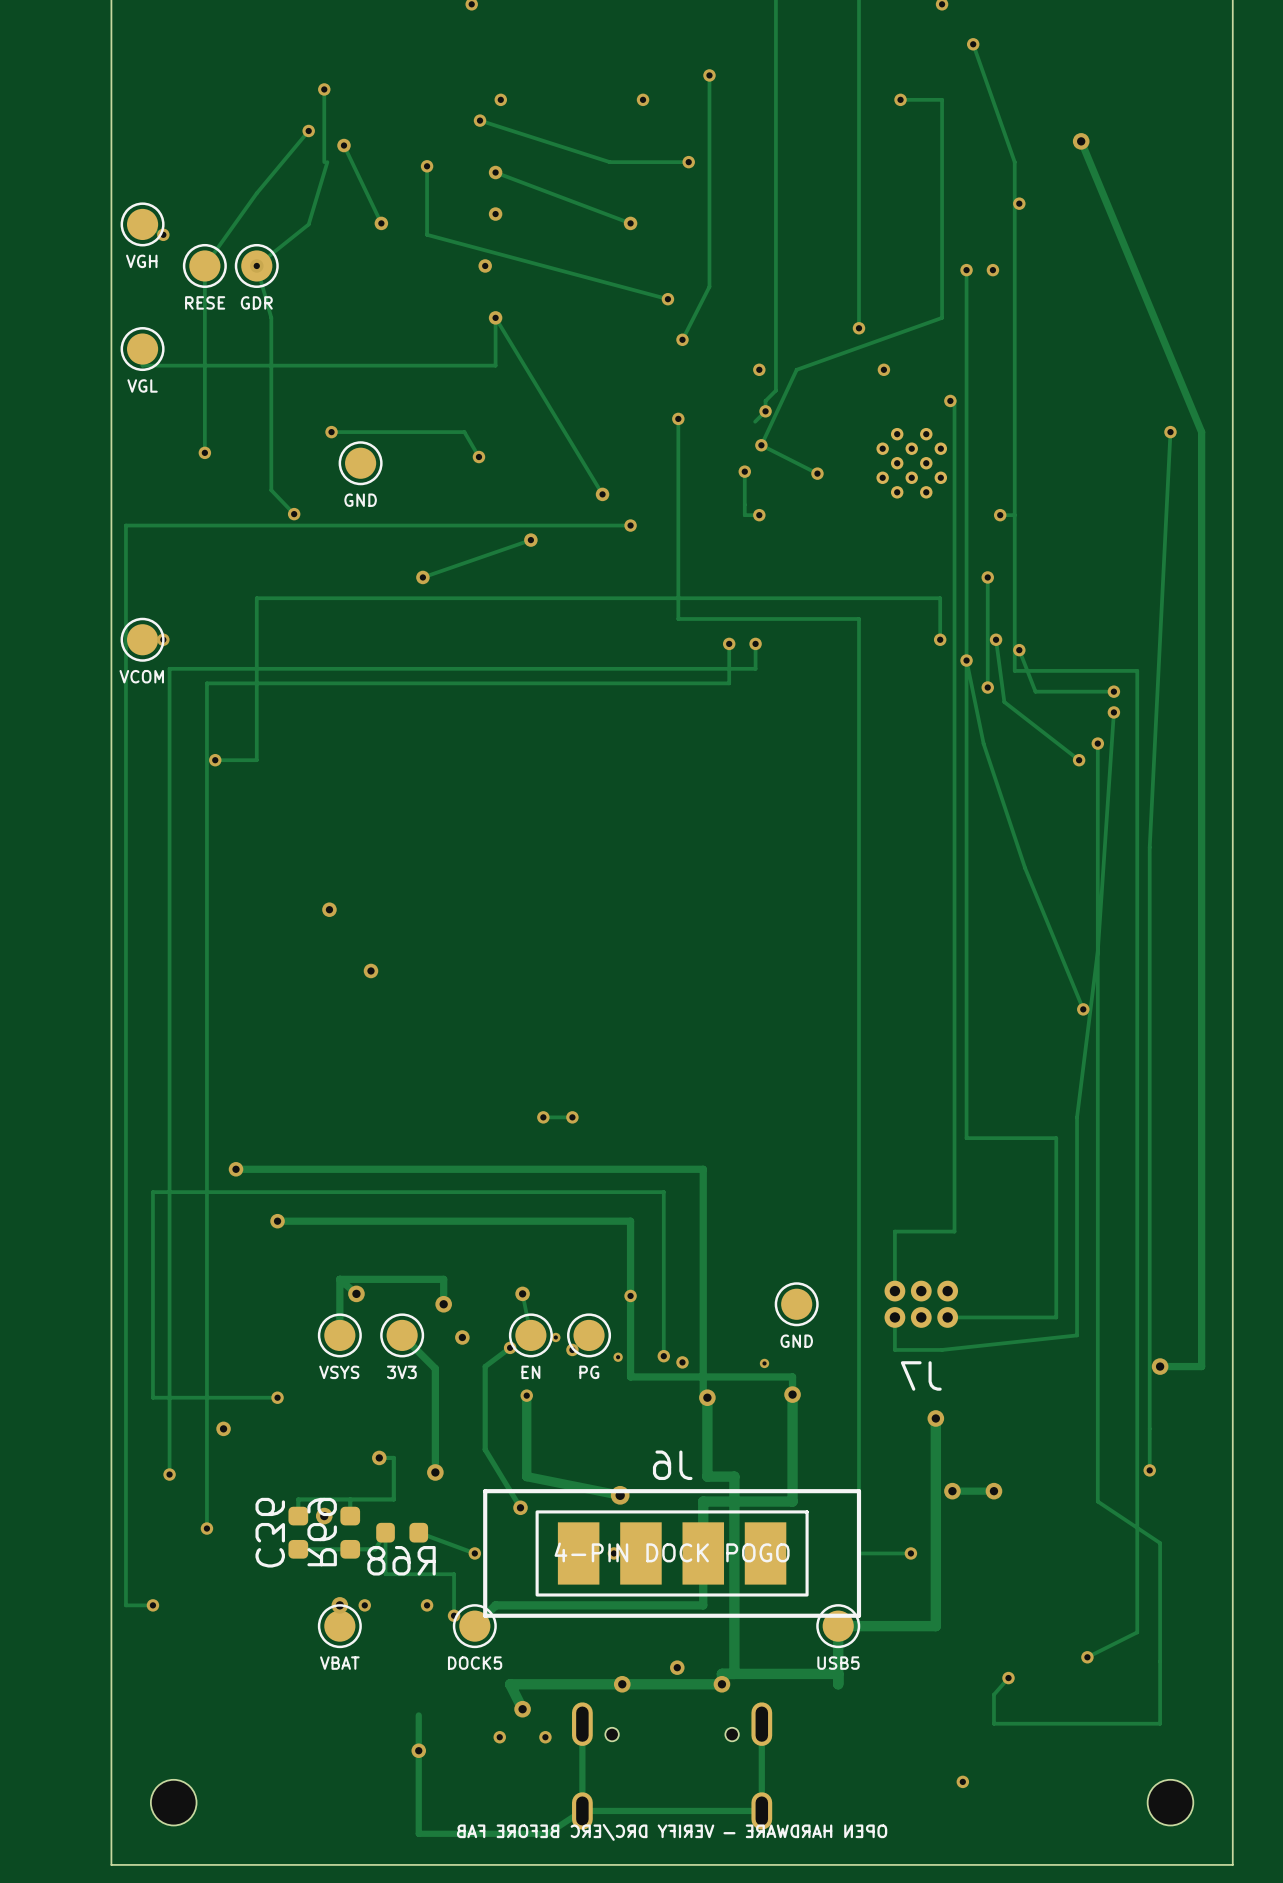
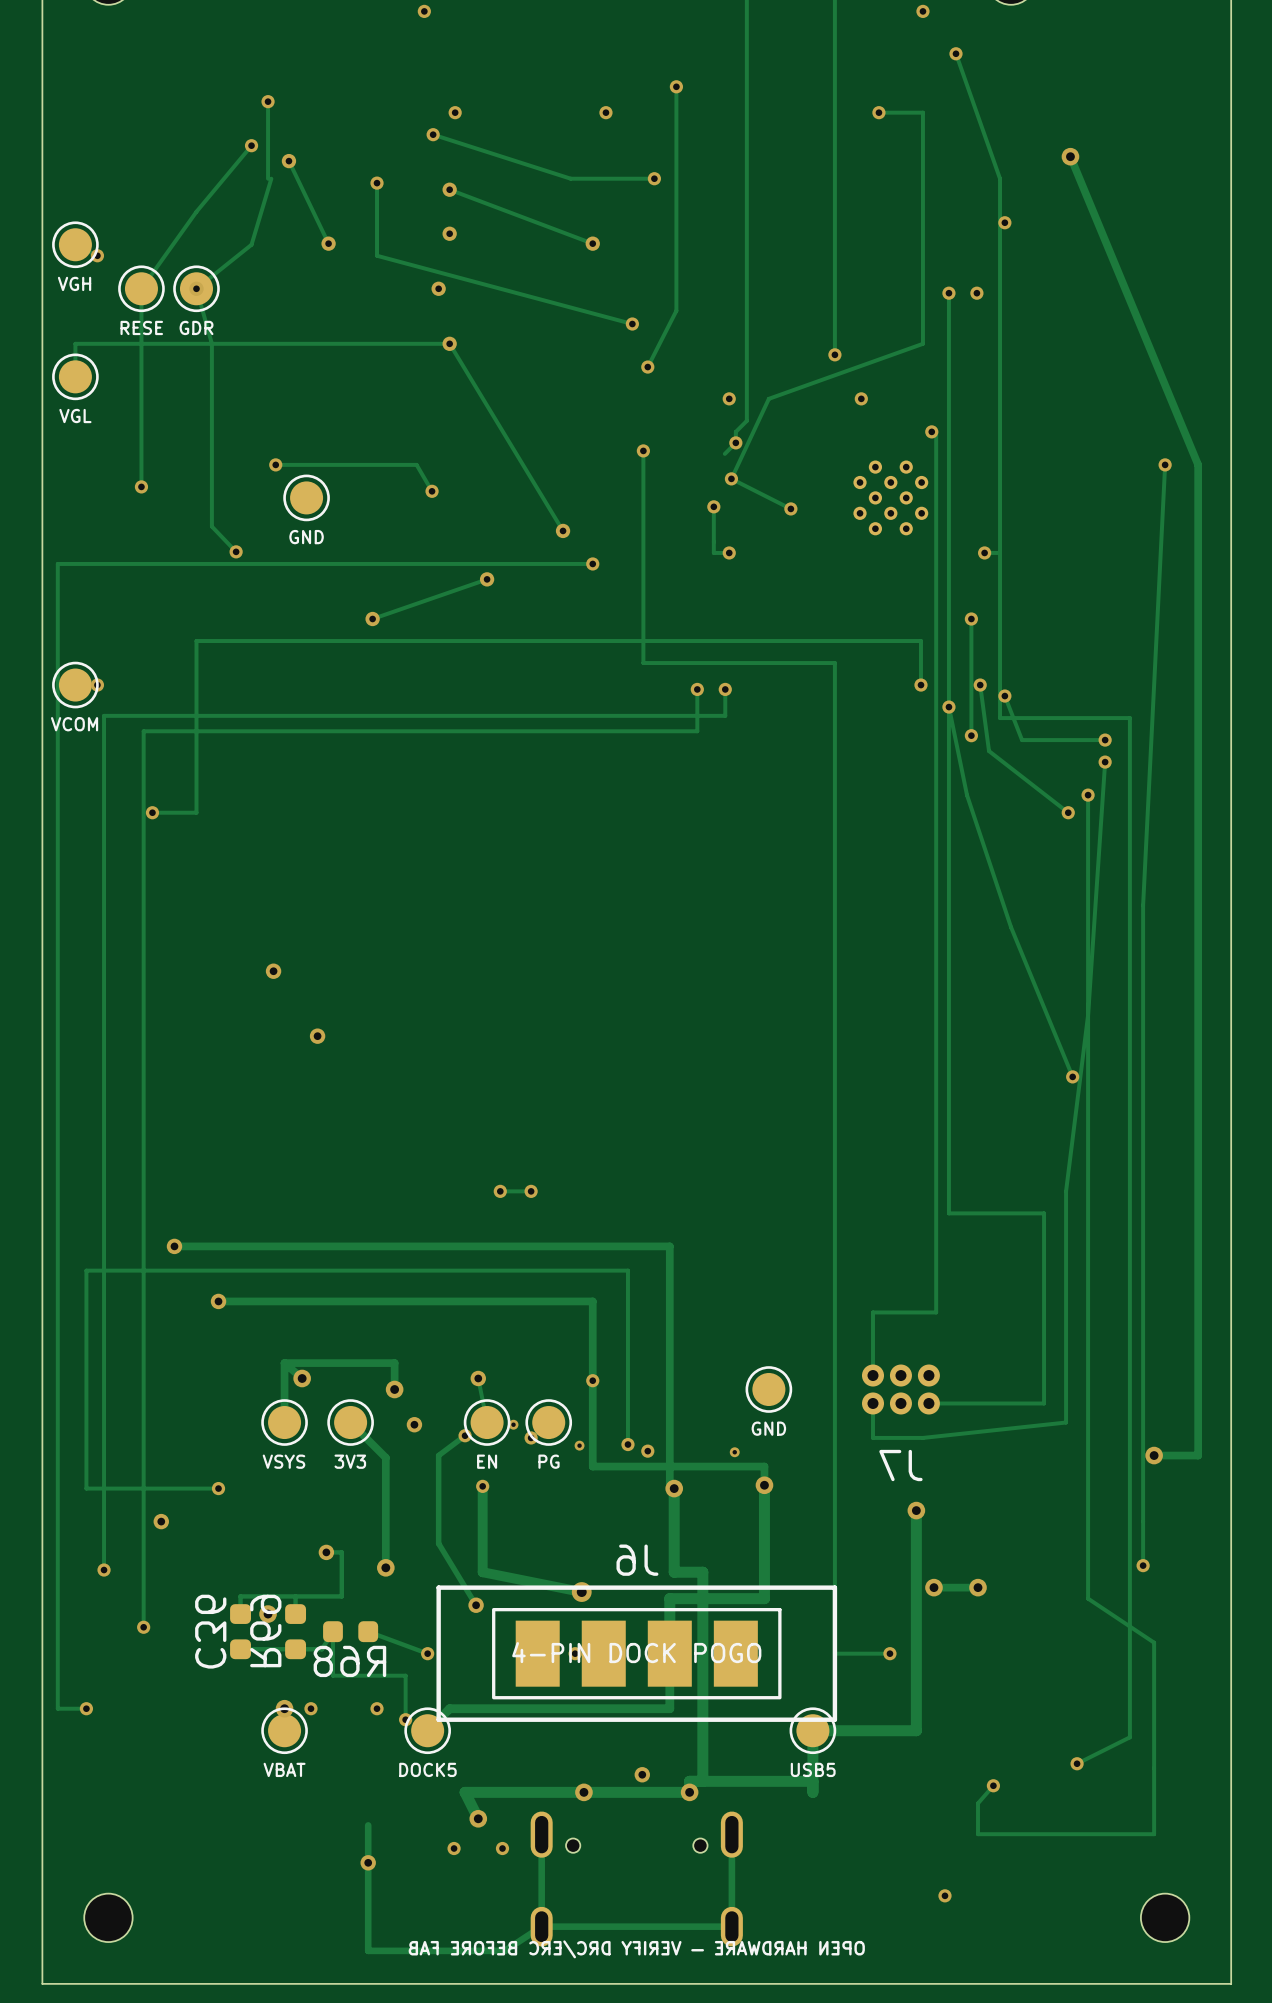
track: (495, 317) (495, 365) (142, 365) (142, 349) -> (449, 343) (75, 343) (75, 376)

